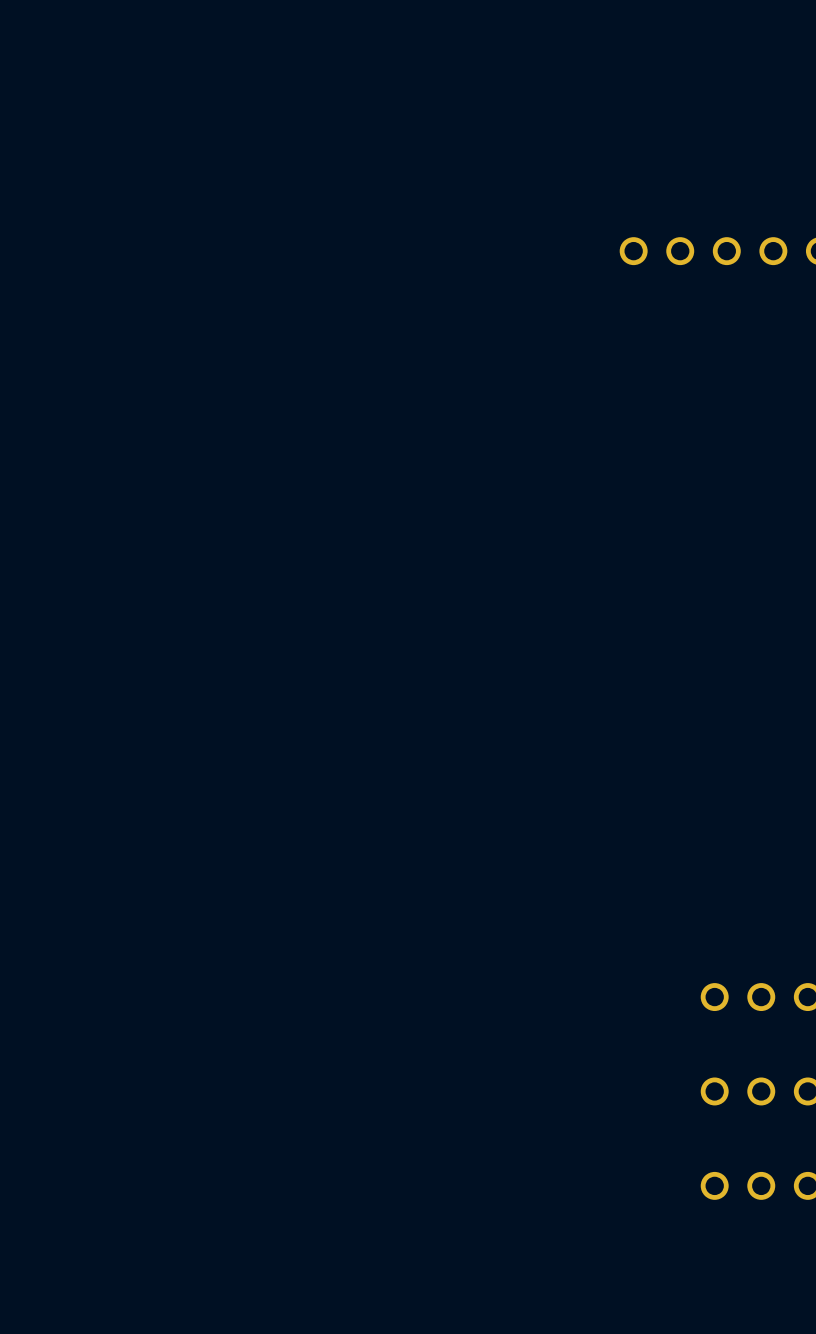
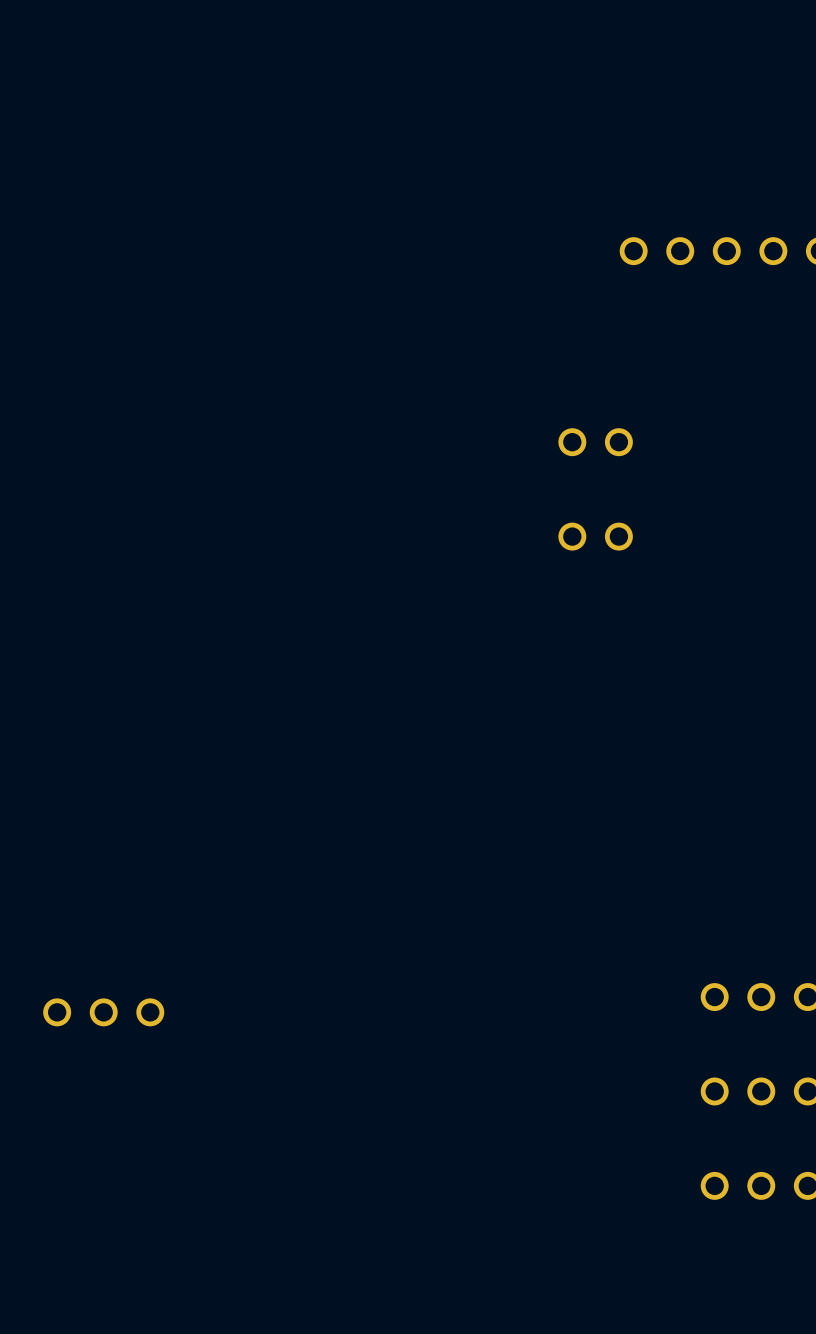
part: none -> (595, 442)
part: none -> (595, 536)
part: none -> (103, 1012)

